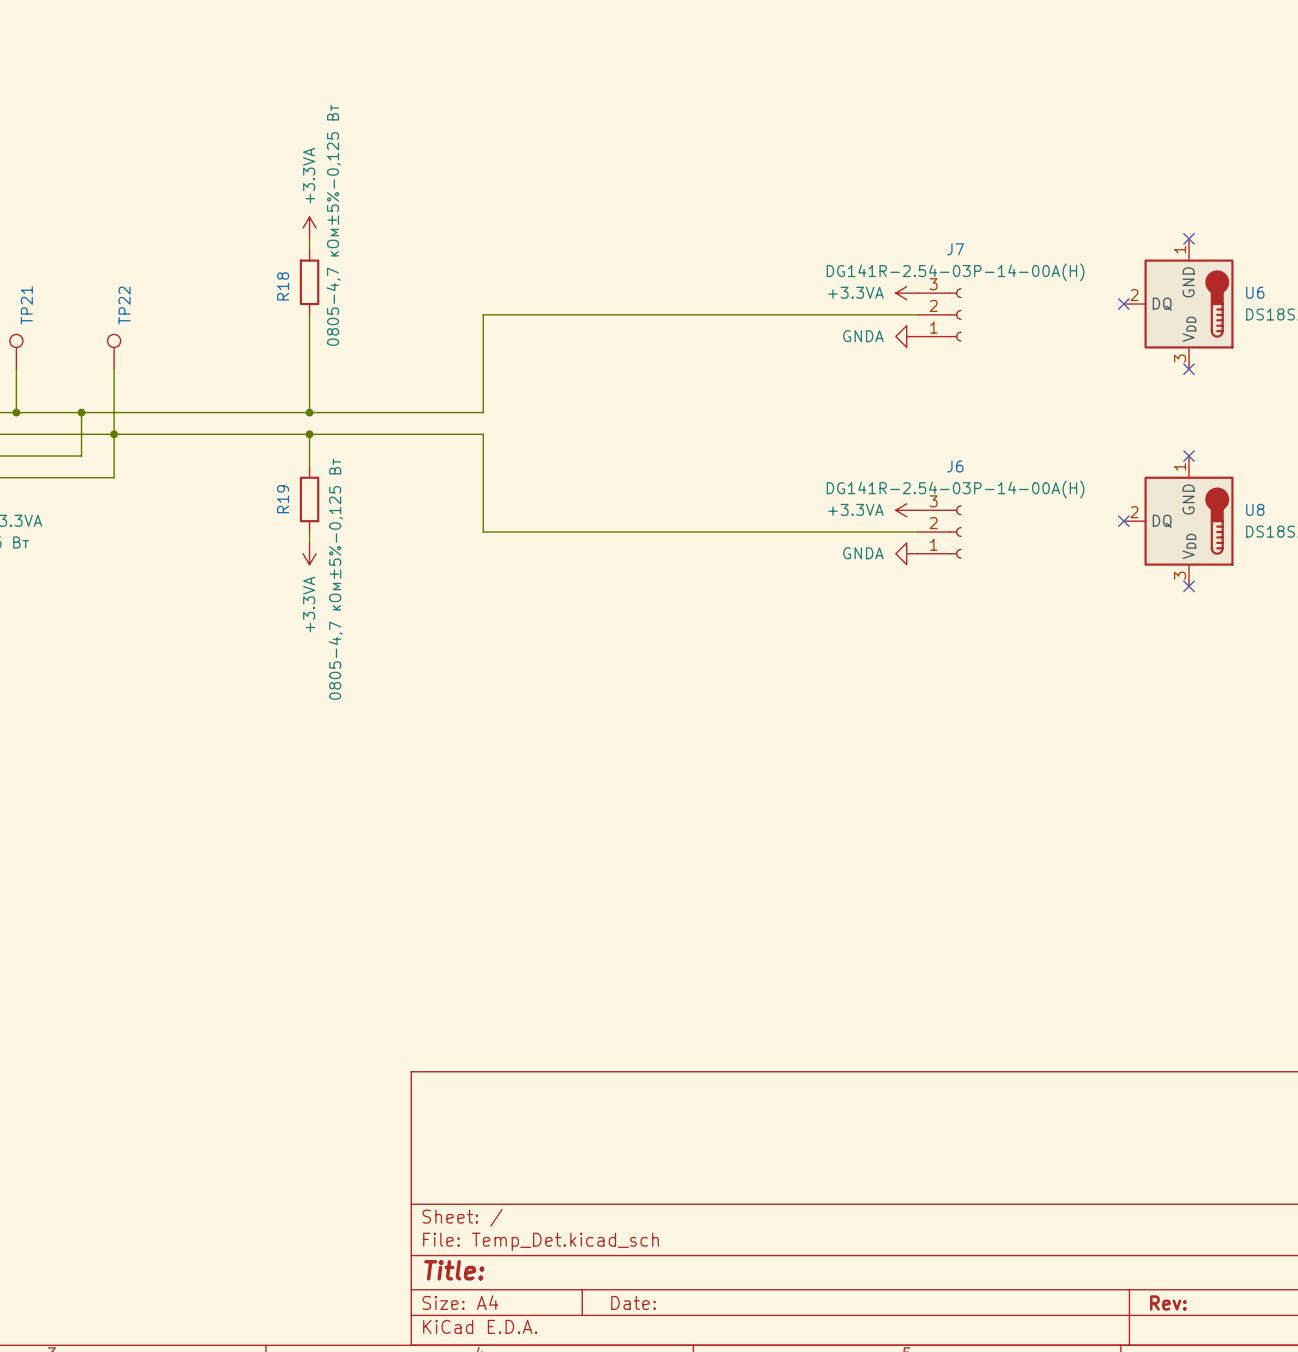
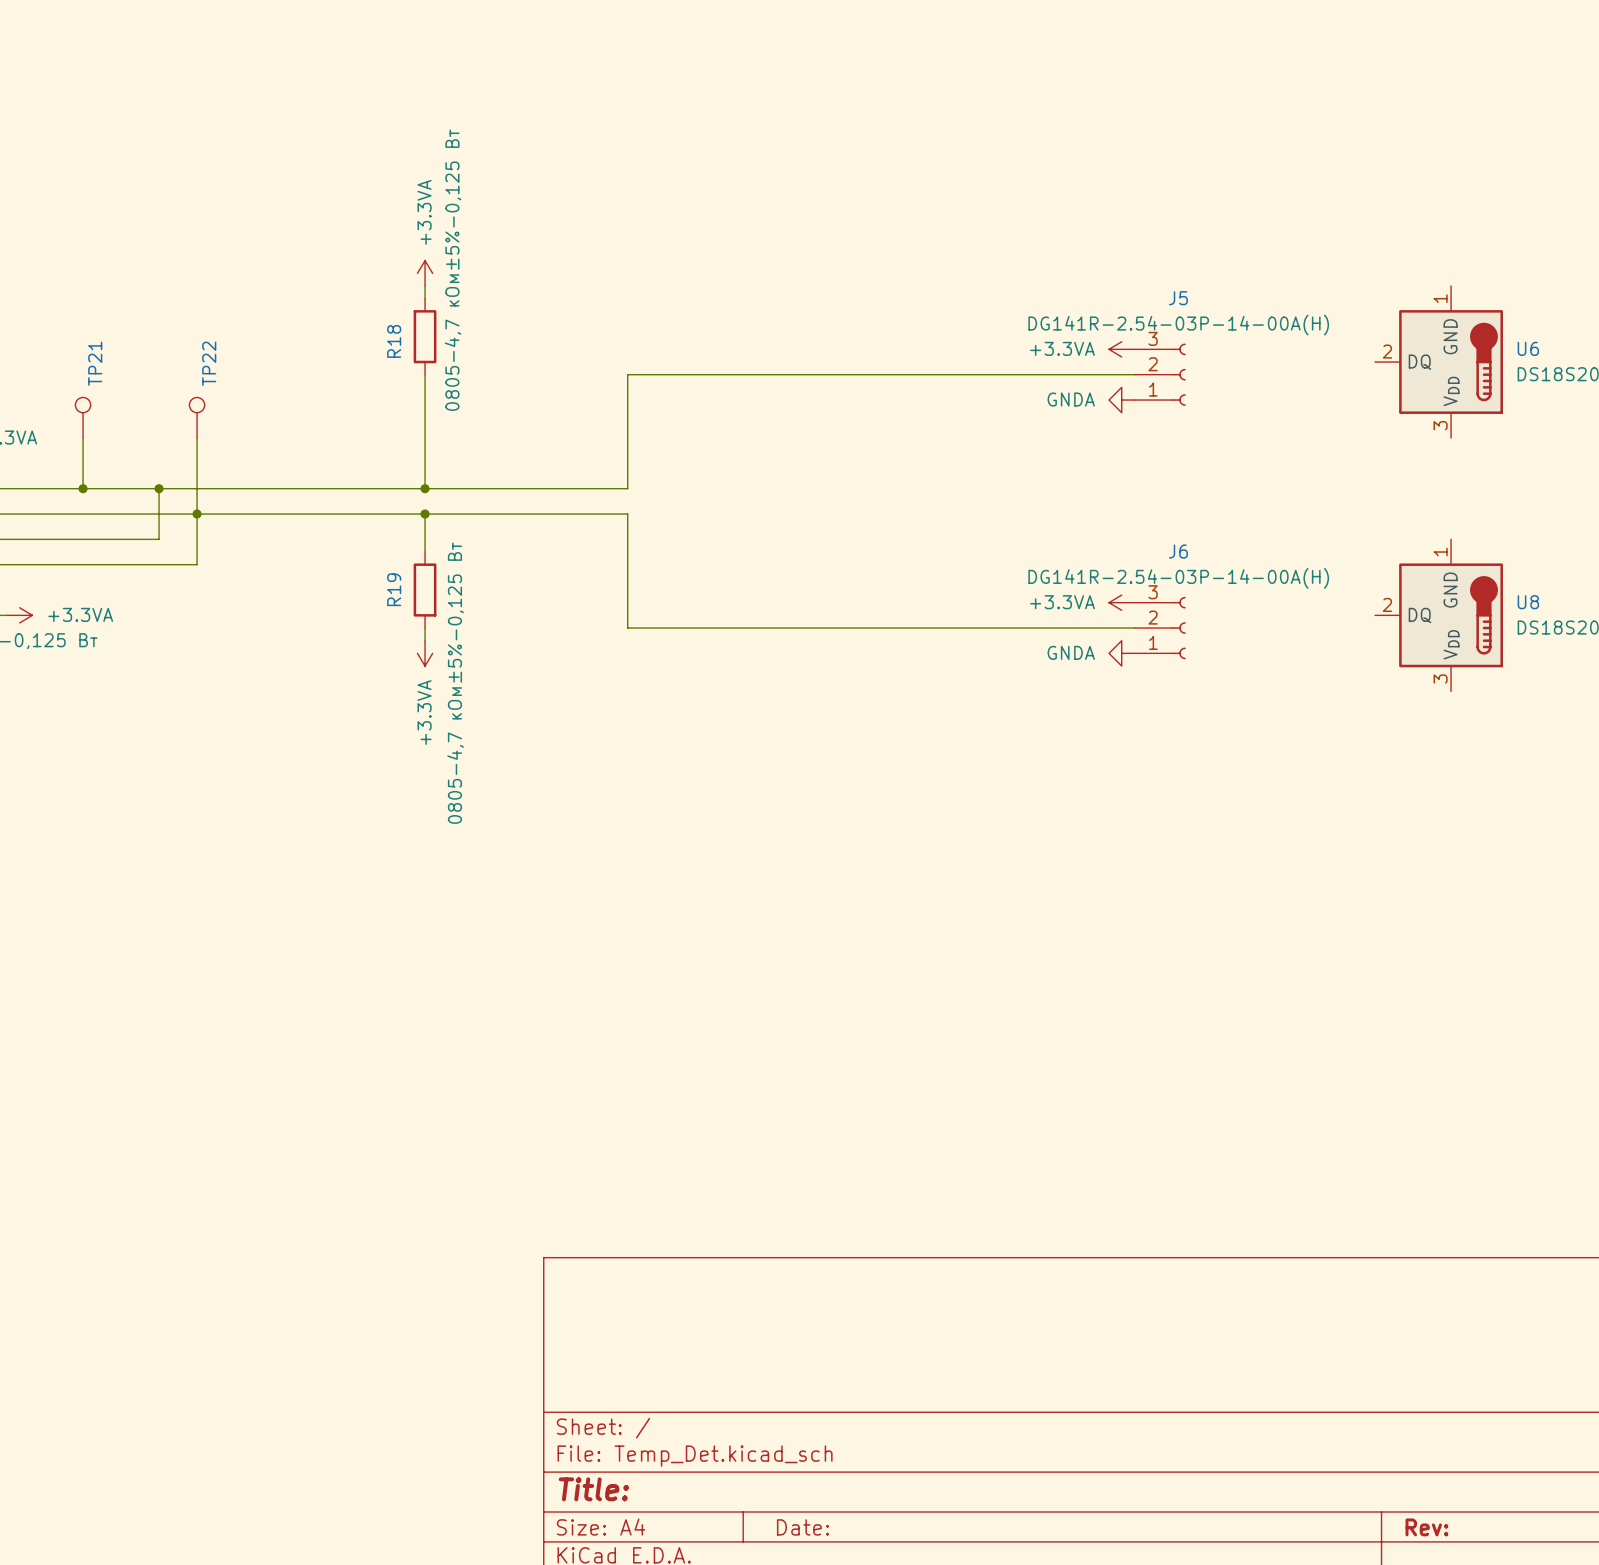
no-connect mark: (1189, 238) -> none
J7 name: J7 (955, 249) -> J5 (1178, 298)
no-connect mark: (1123, 304) -> none
no-connect mark: (1189, 369) -> none
no-connect mark: (1189, 456) -> none
no-connect mark: (1123, 521) -> none
no-connect mark: (1189, 586) -> none

